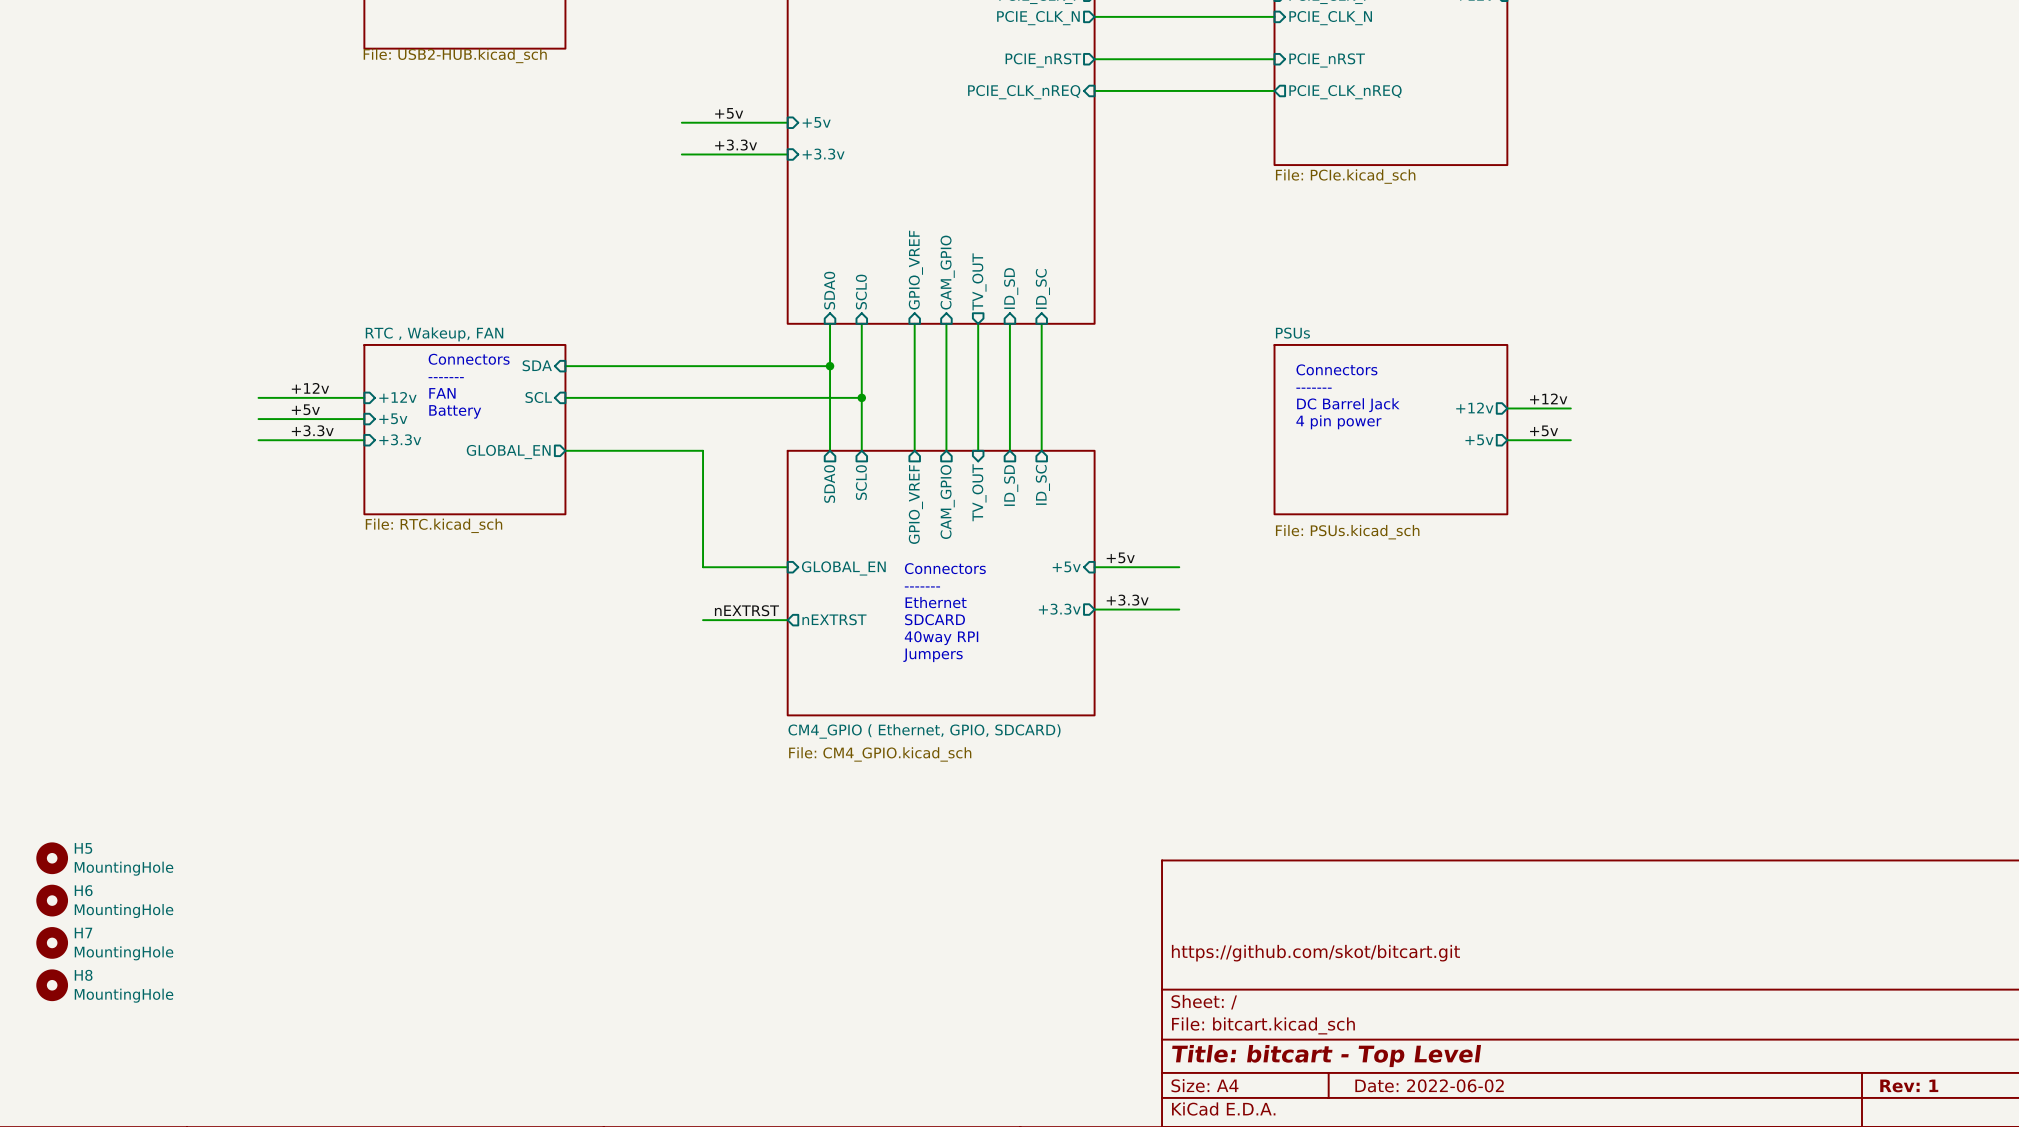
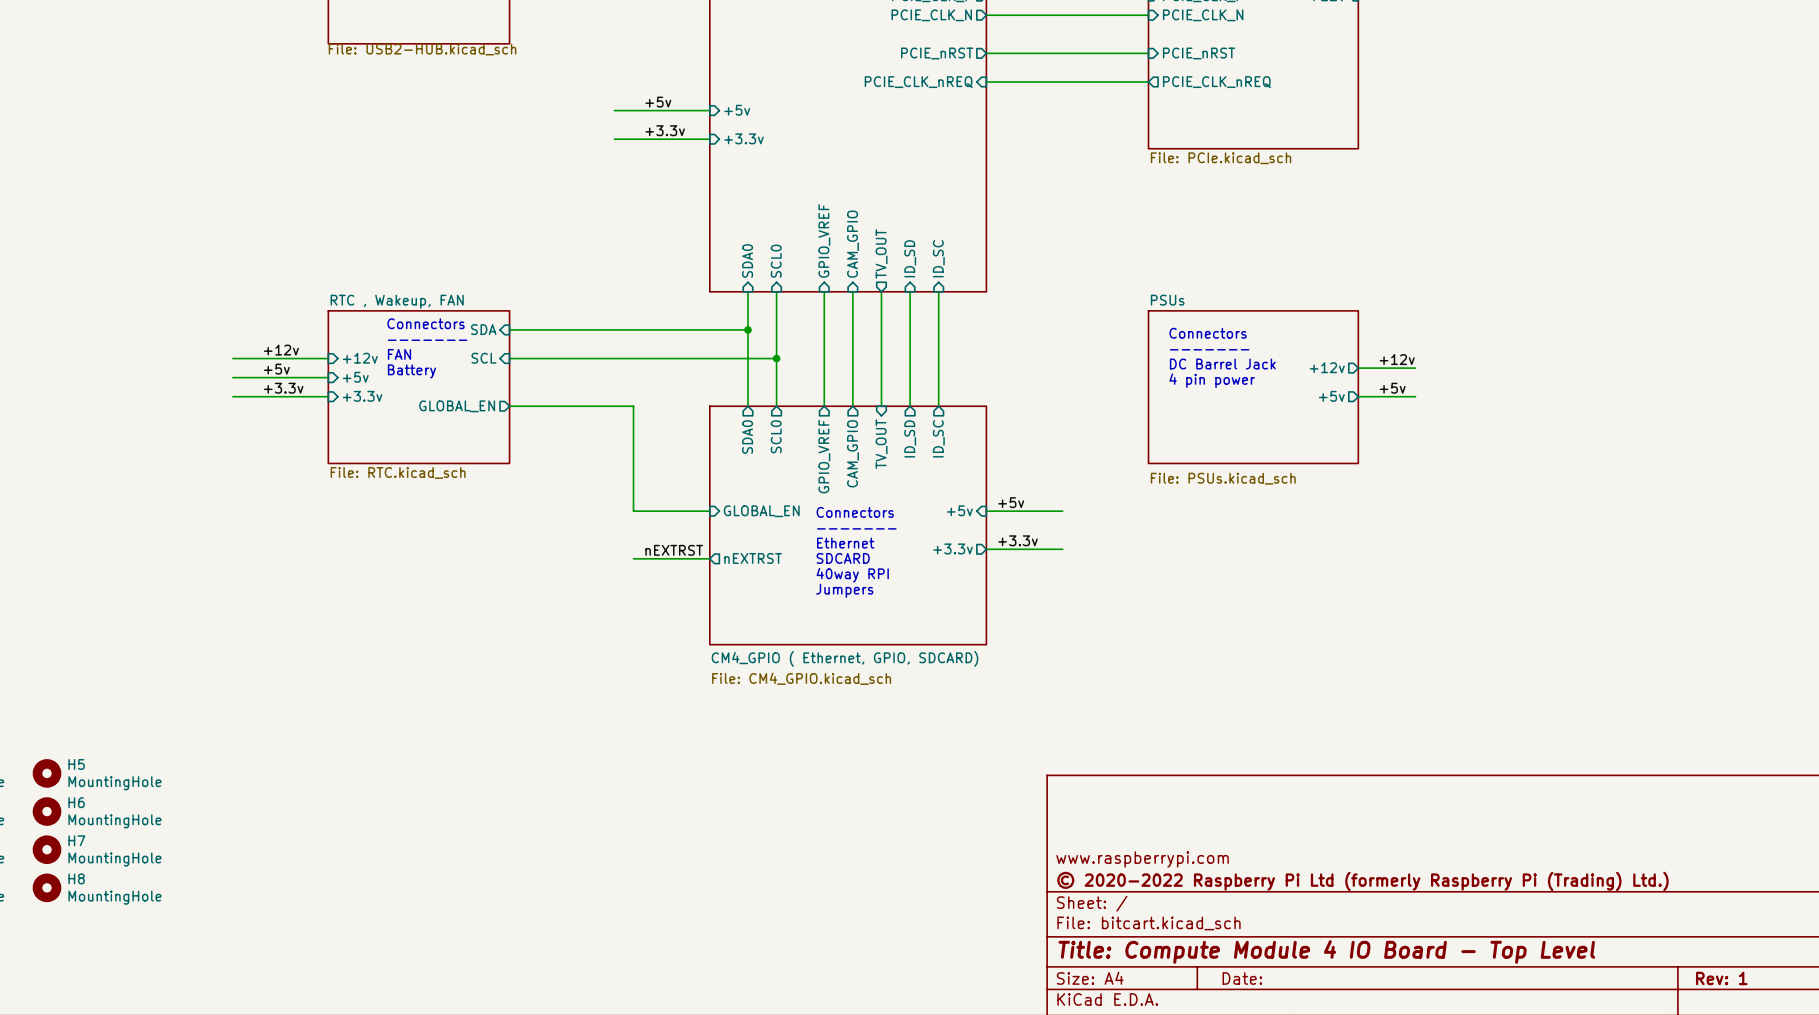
title block: https://github.com/skot/bitcart.git (1315, 953) -> www.raspberrypi.com (1142, 859)
title block: none -> © 2020-2022 Raspberry Pi Ltd (formerly Raspberry Pi (Trading) Ltd.) (1362, 881)
title block: Title: bitcart - Top Level (1326, 1056) -> Title: Compute Module 4 IO Board - Top Level (1326, 951)
title block: Date: 2022-06-02 (1429, 1085) -> Date: (1242, 978)

